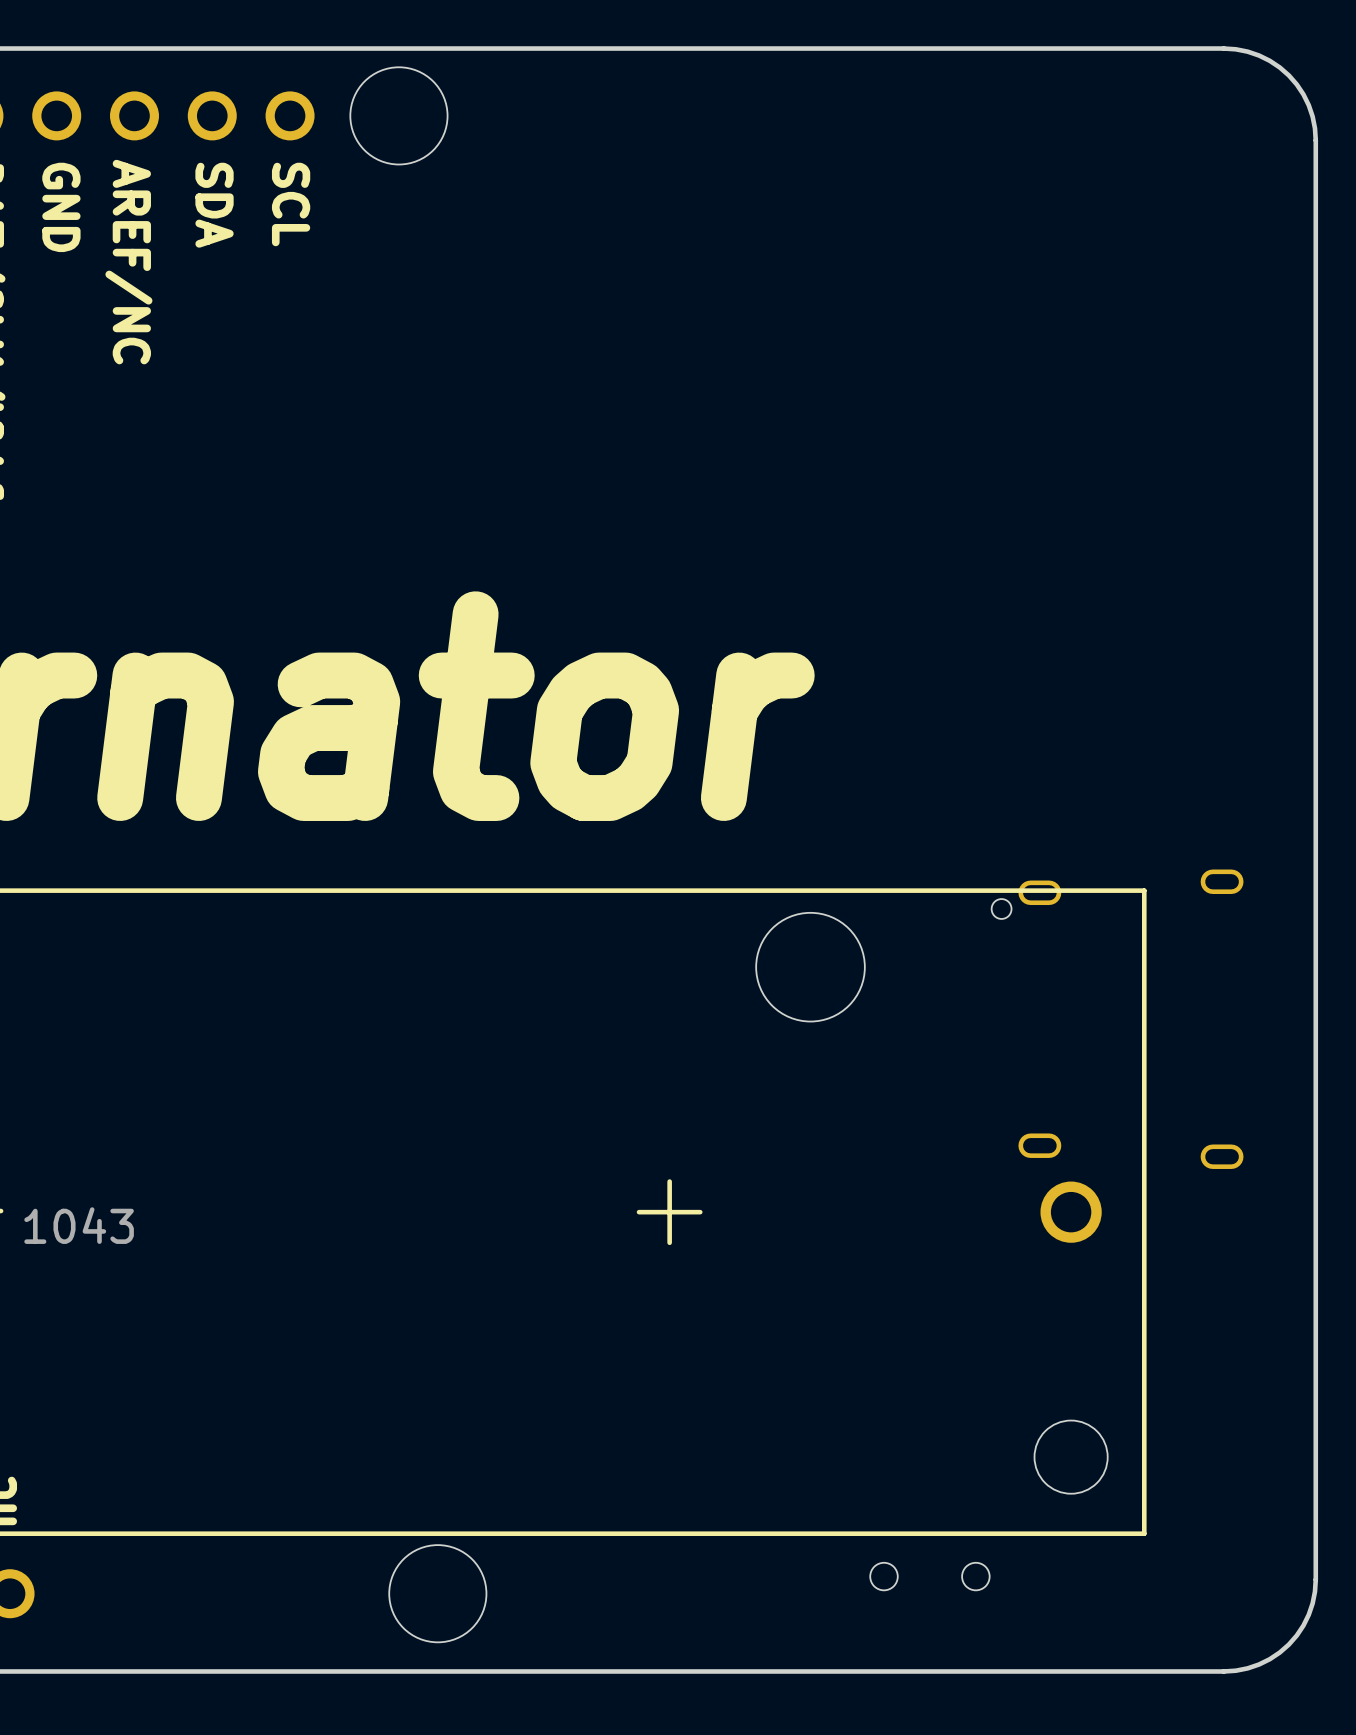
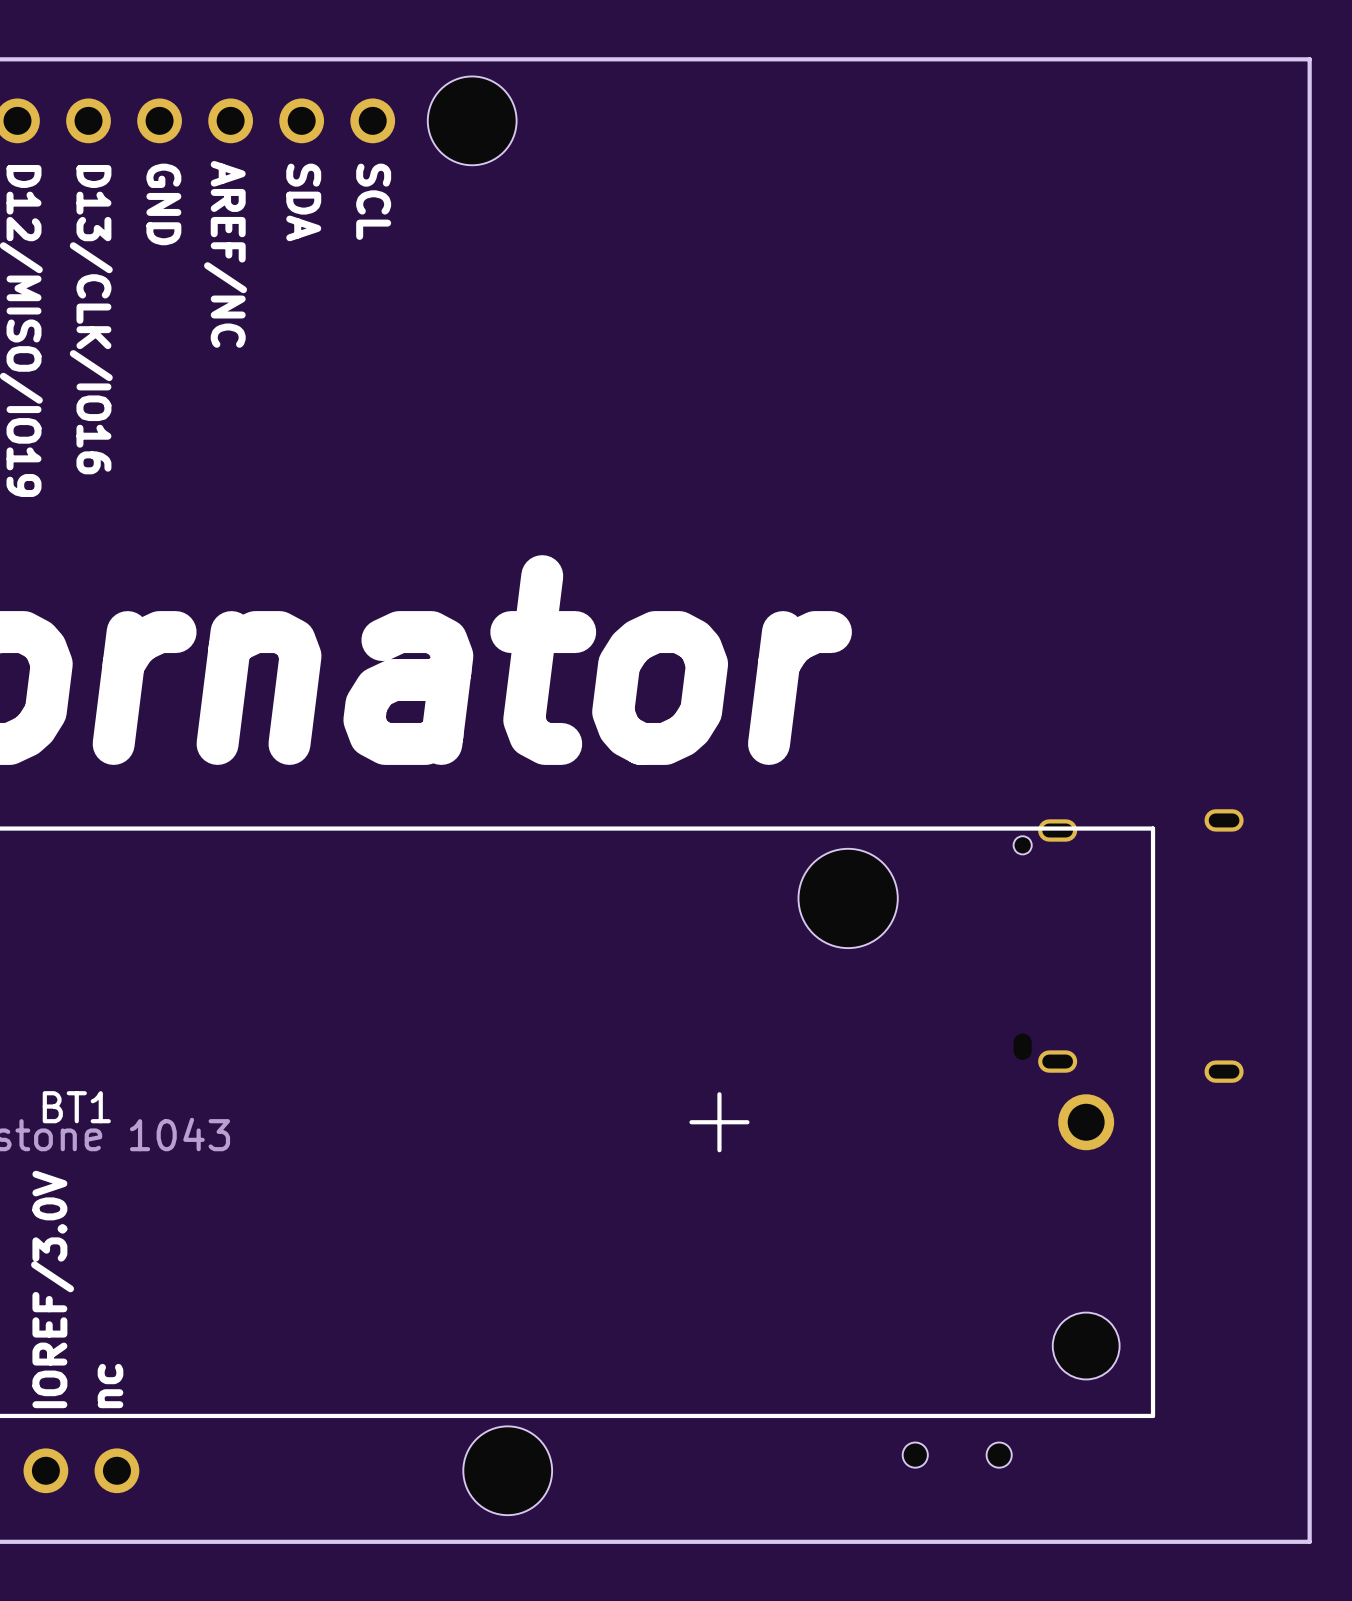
board edge: (1223, 48) (1235, 49) (1259, 55) (1269, 60) (1288, 75) (1296, 84) (1308, 105) (1312, 116) (1315, 140) -> (1225, 59) (1309, 59) (1309, 143)
board edge: (1315, 1579) (1312, 1603) (1308, 1614) (1296, 1635) (1288, 1644) (1269, 1659) (1259, 1664) (1247, 1668) (1223, 1671) -> (1309, 1457) (1309, 1541) (1225, 1541)

